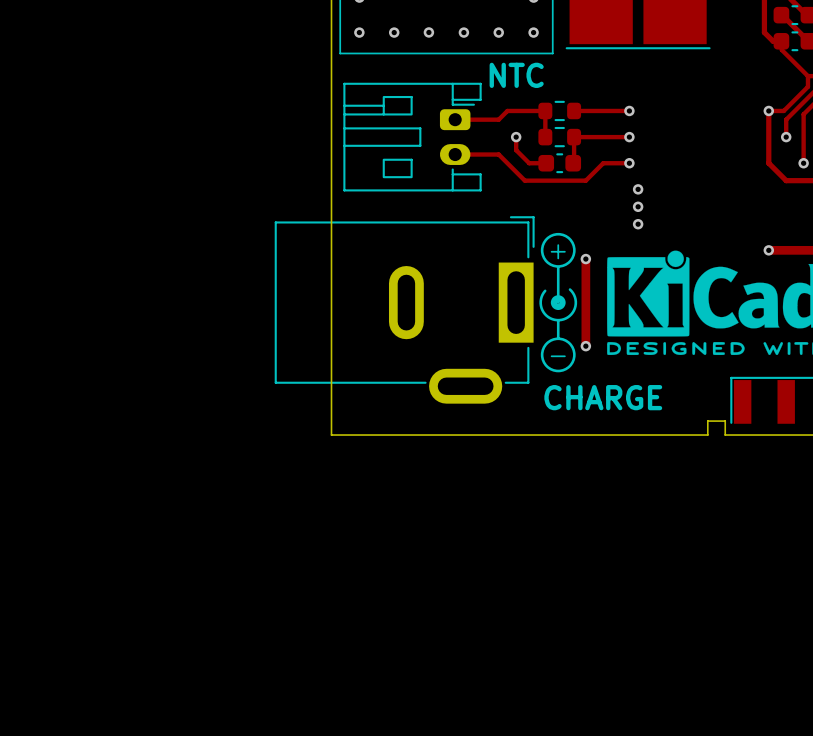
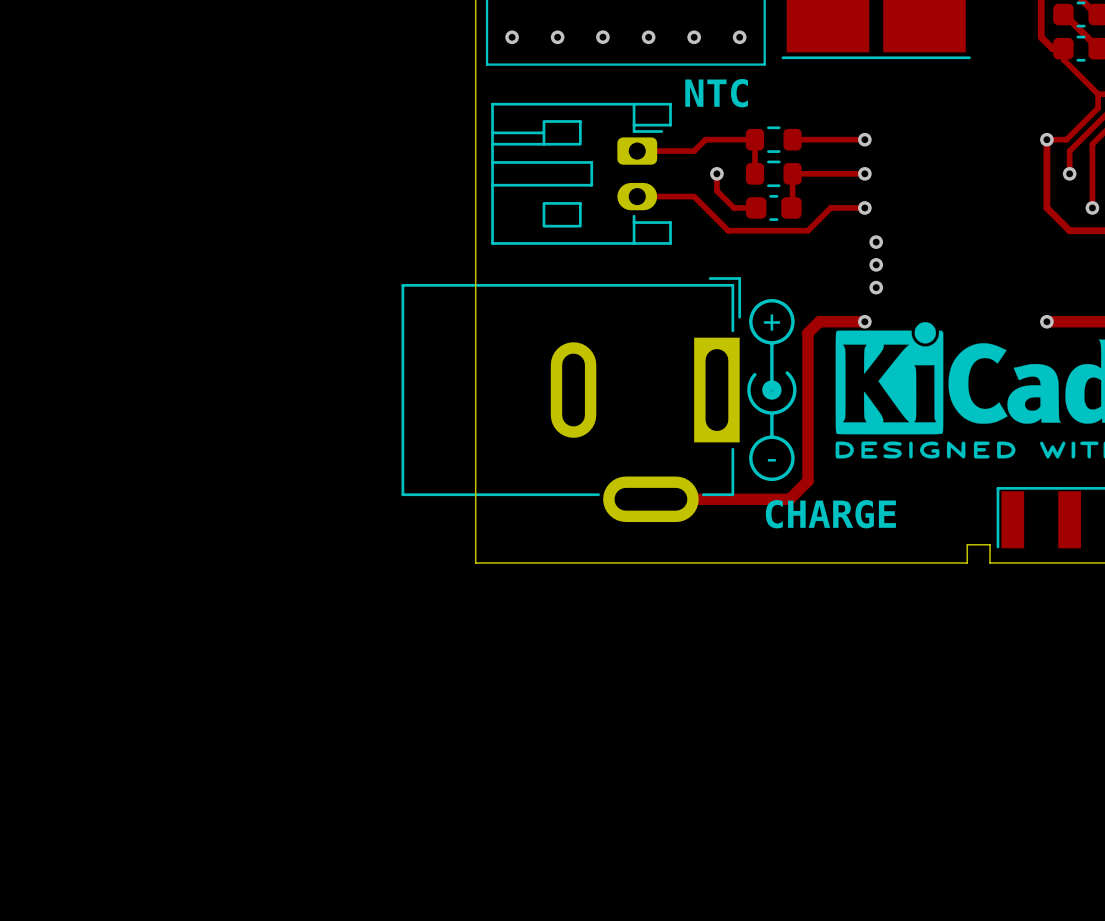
track: none -> (864, 321) (819, 321) (807, 333)
via position: (585, 259) -> (864, 321)
track: none -> (807, 446) (807, 481) (789, 499) (650, 499)
via: (585, 346) -> none

